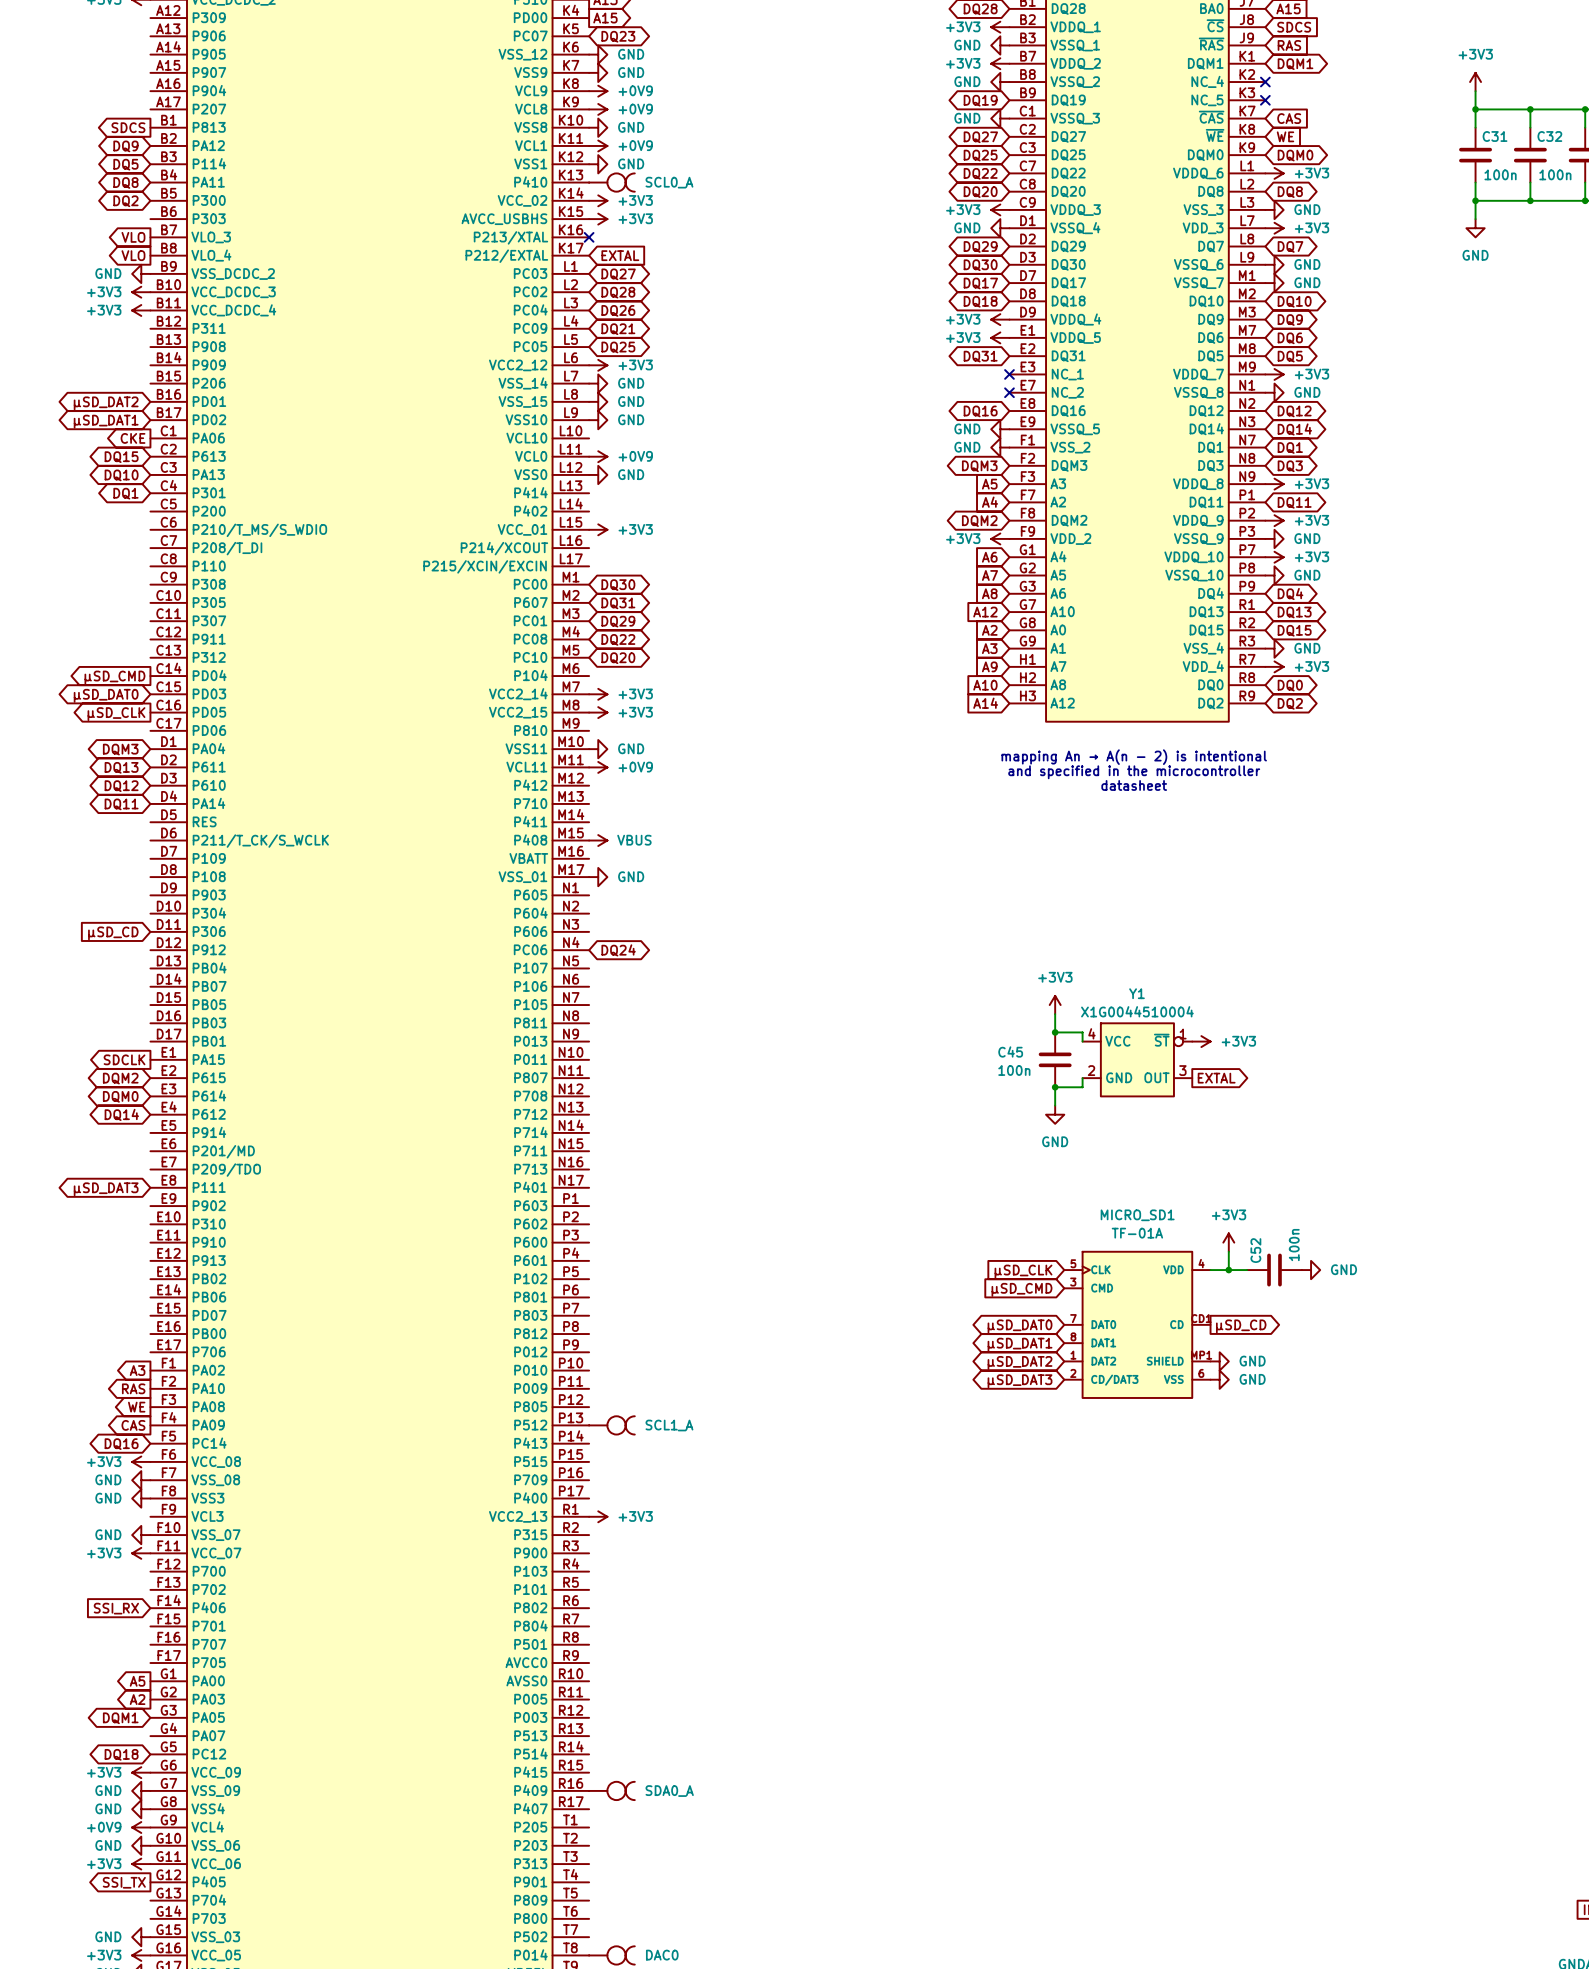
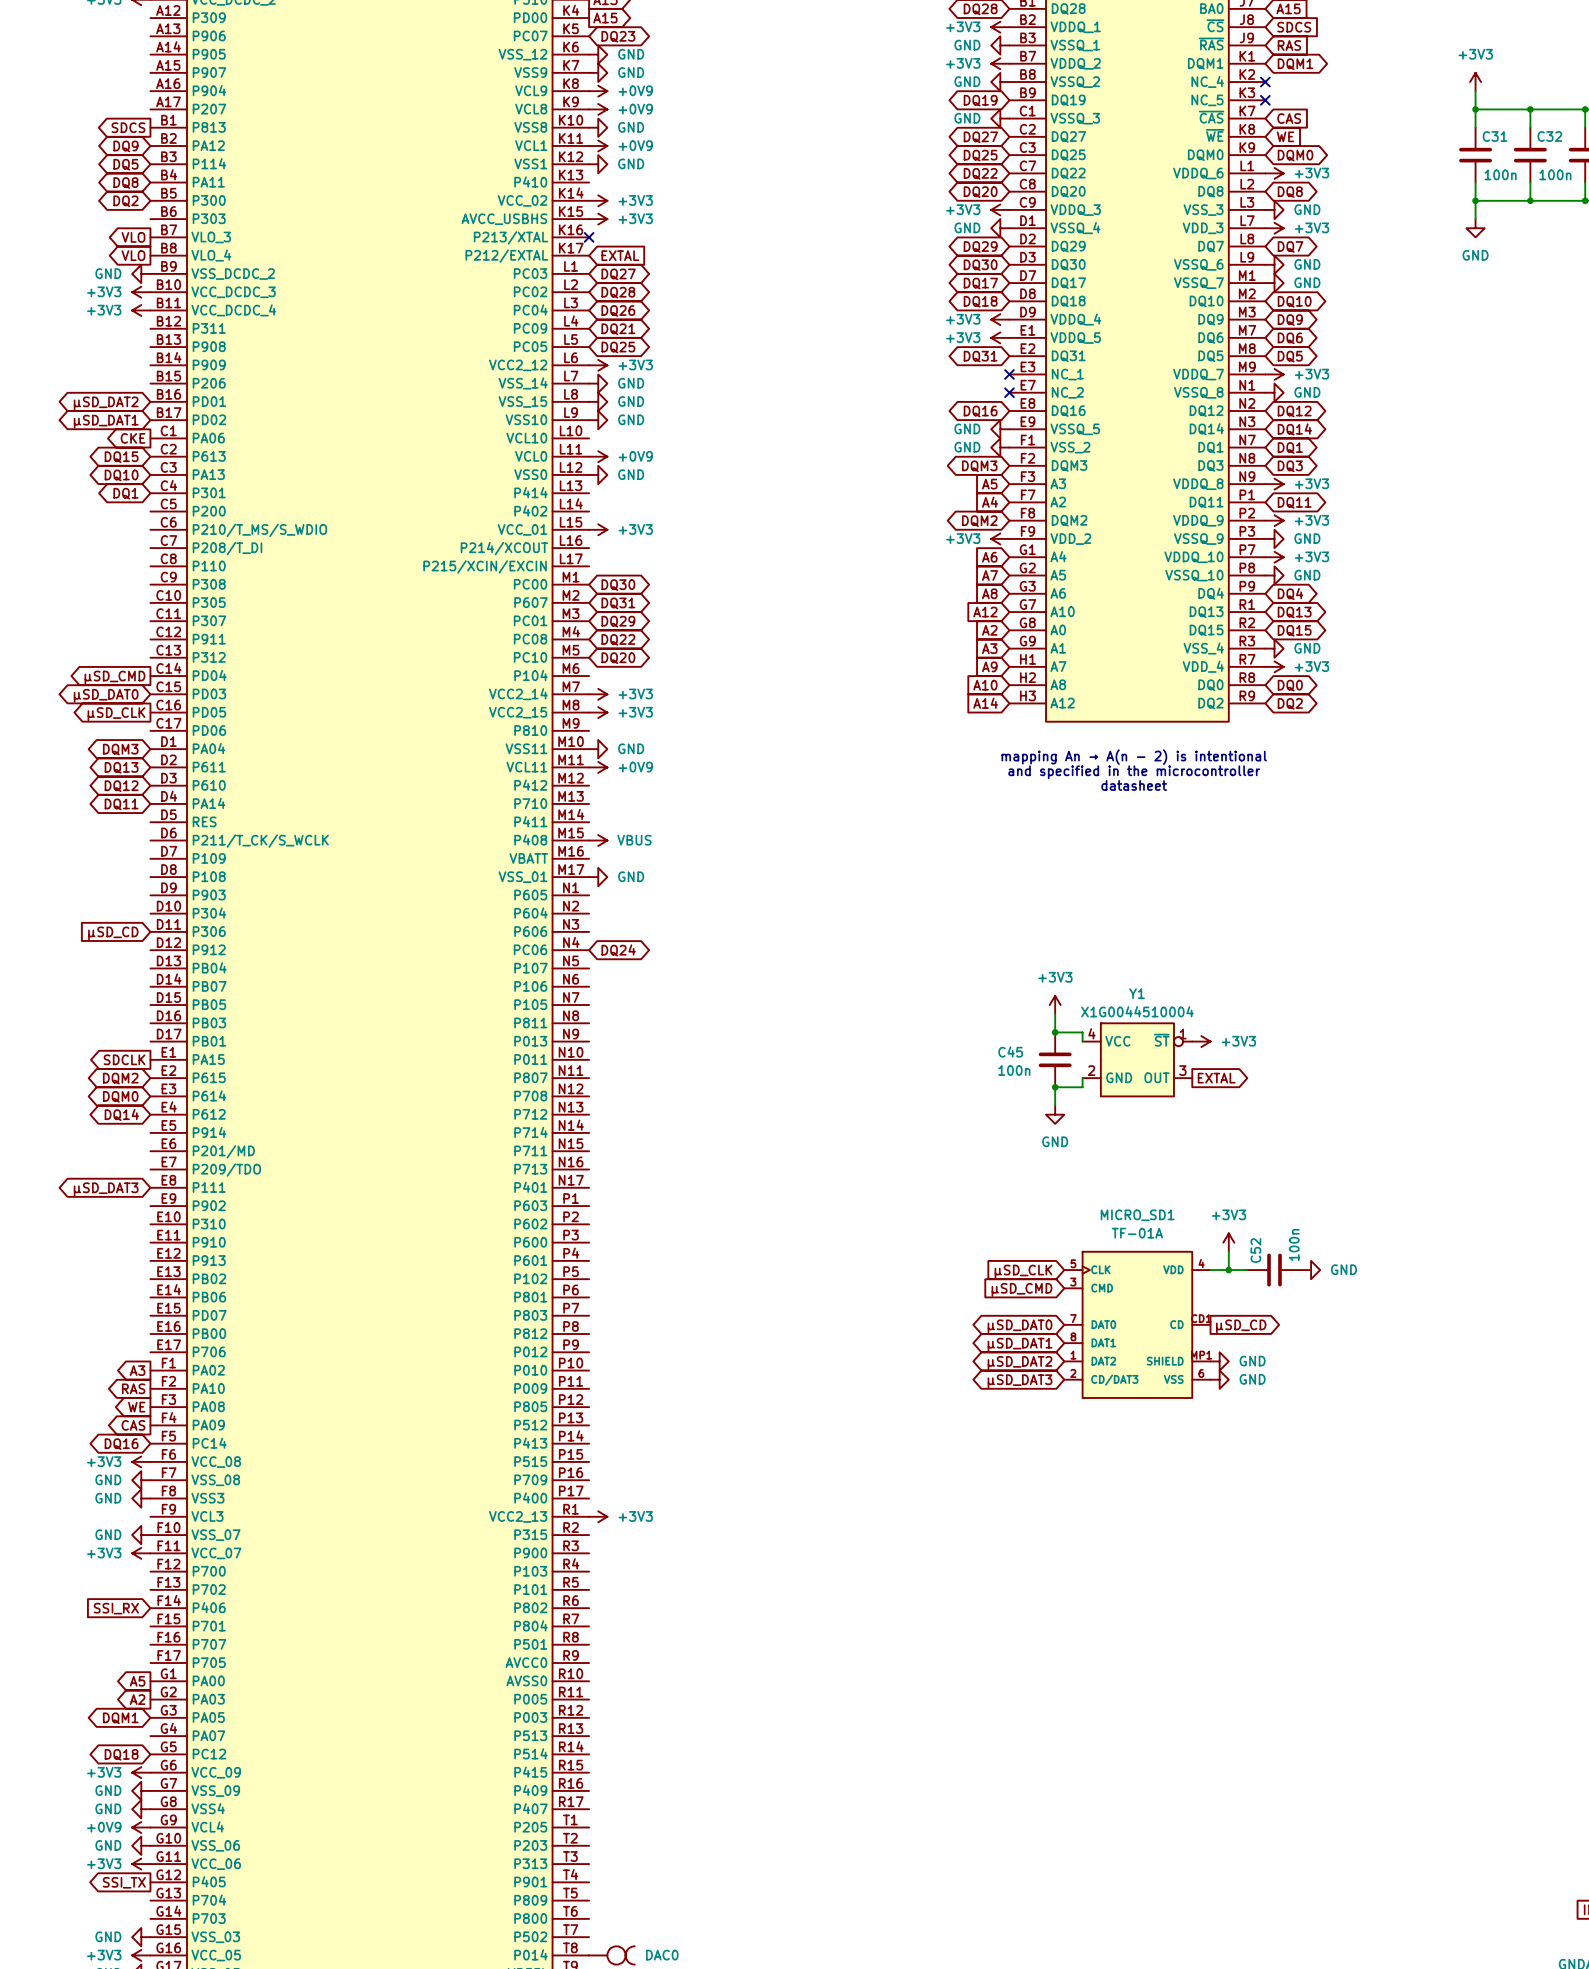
part: SCL0_A (611, 182) -> none
part: SCL1_A (611, 1425) -> none
part: SDA0_A (611, 1790) -> none

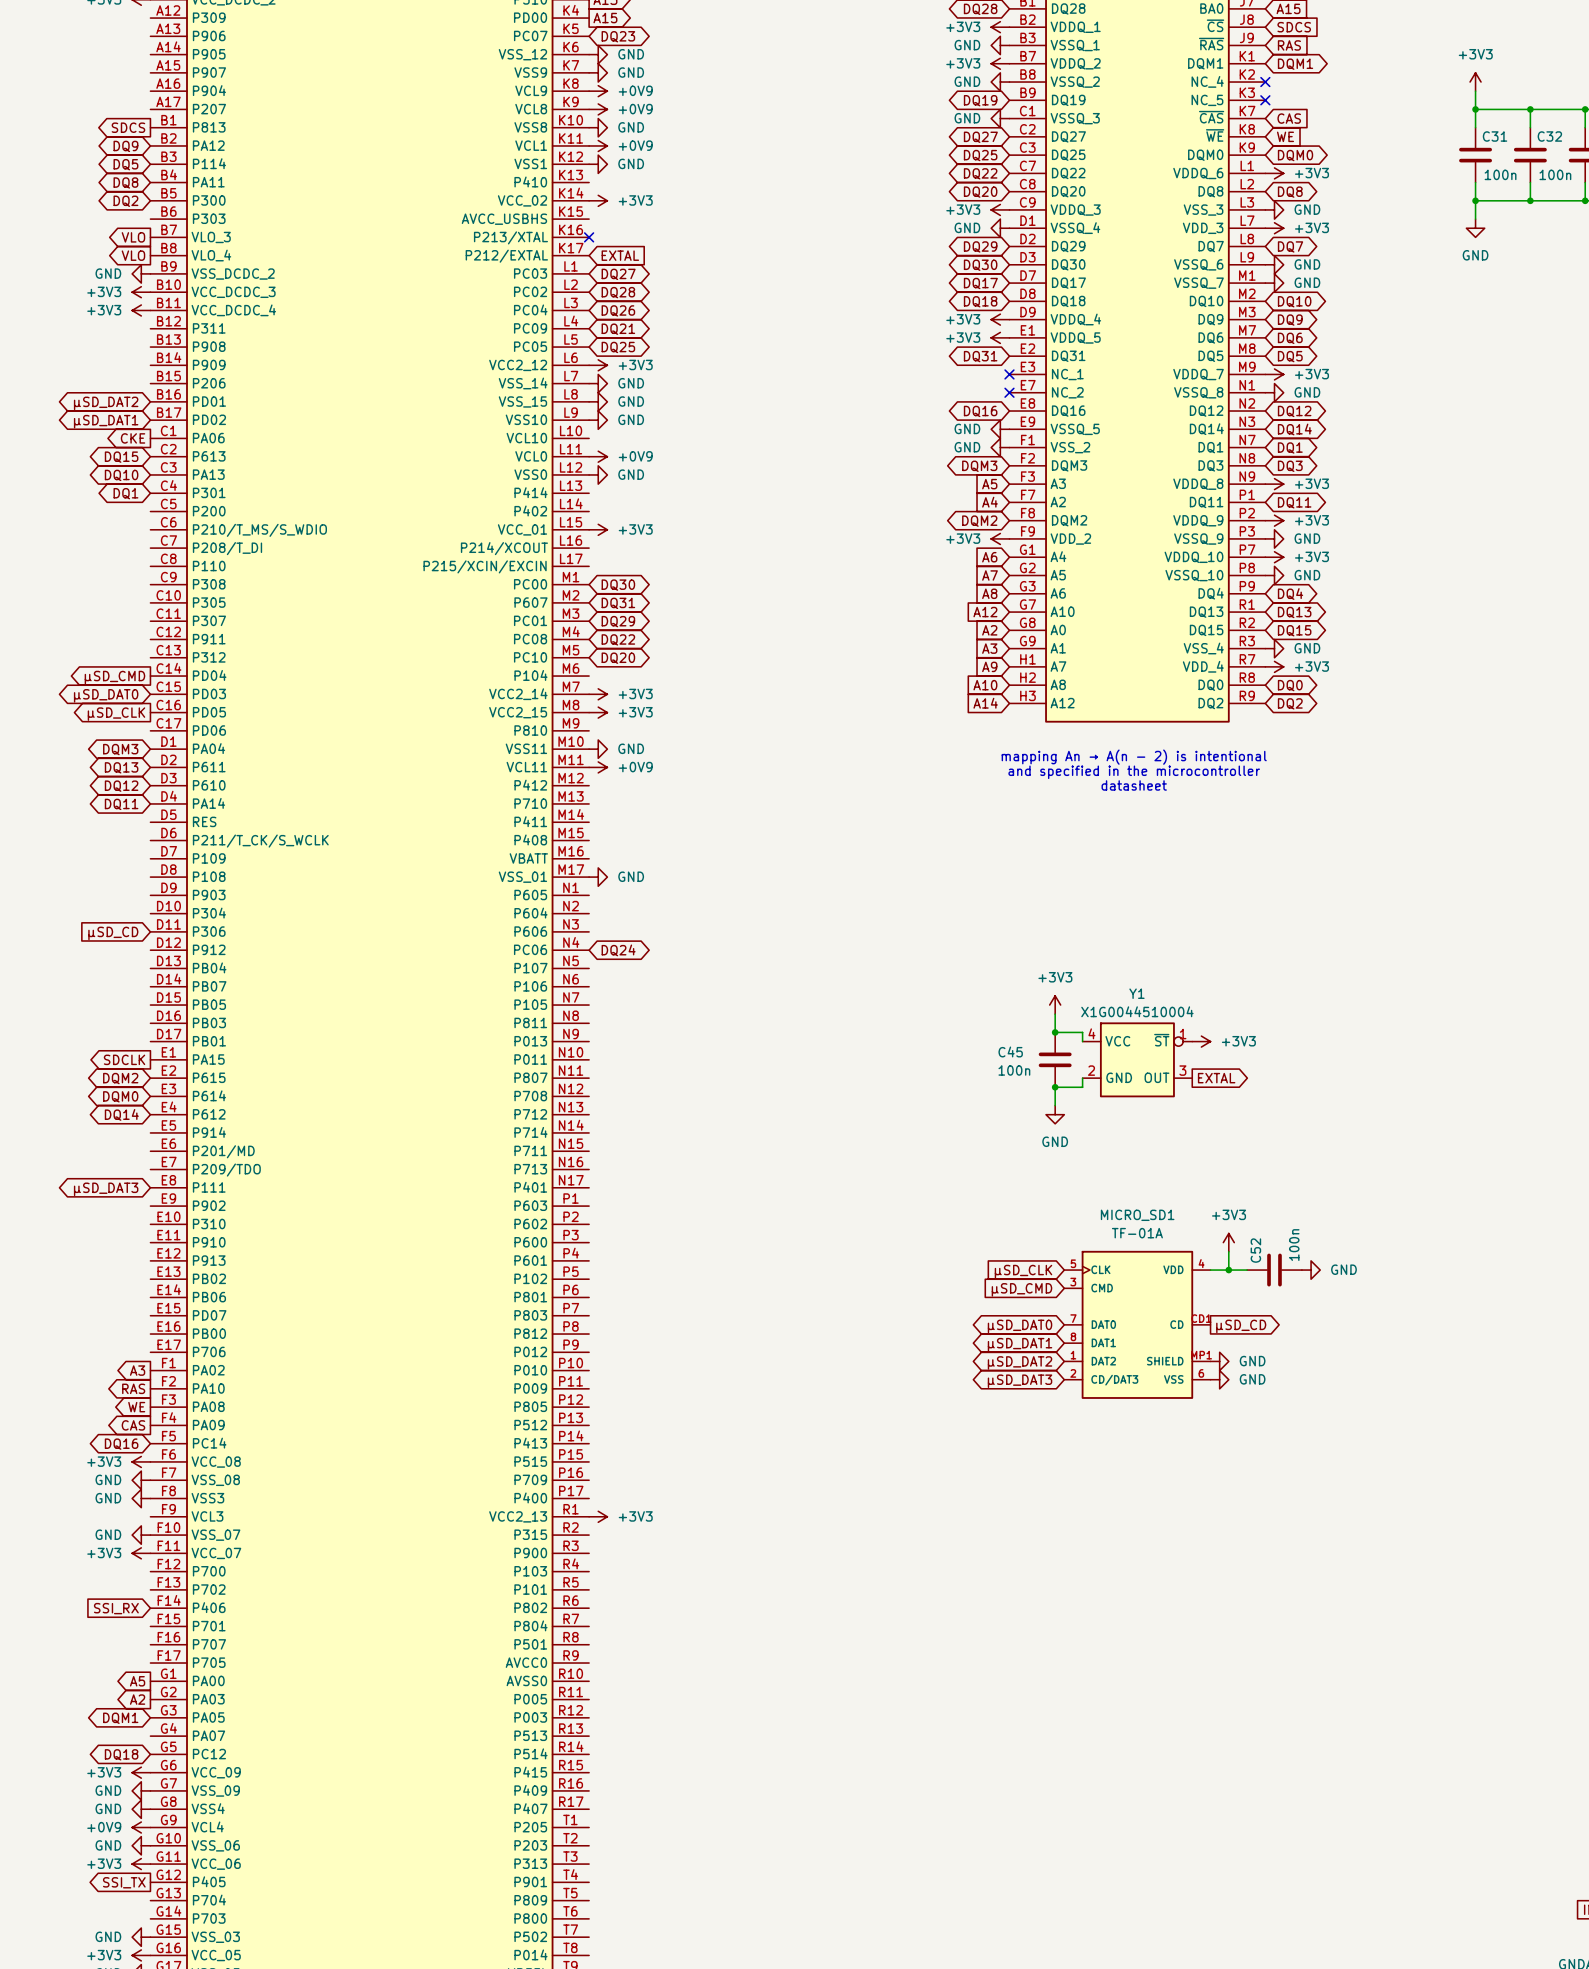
power symbol: +3V3 (598, 219) -> none
power symbol: VBUS (598, 840) -> none
part: DAC0 (611, 1955) -> none

